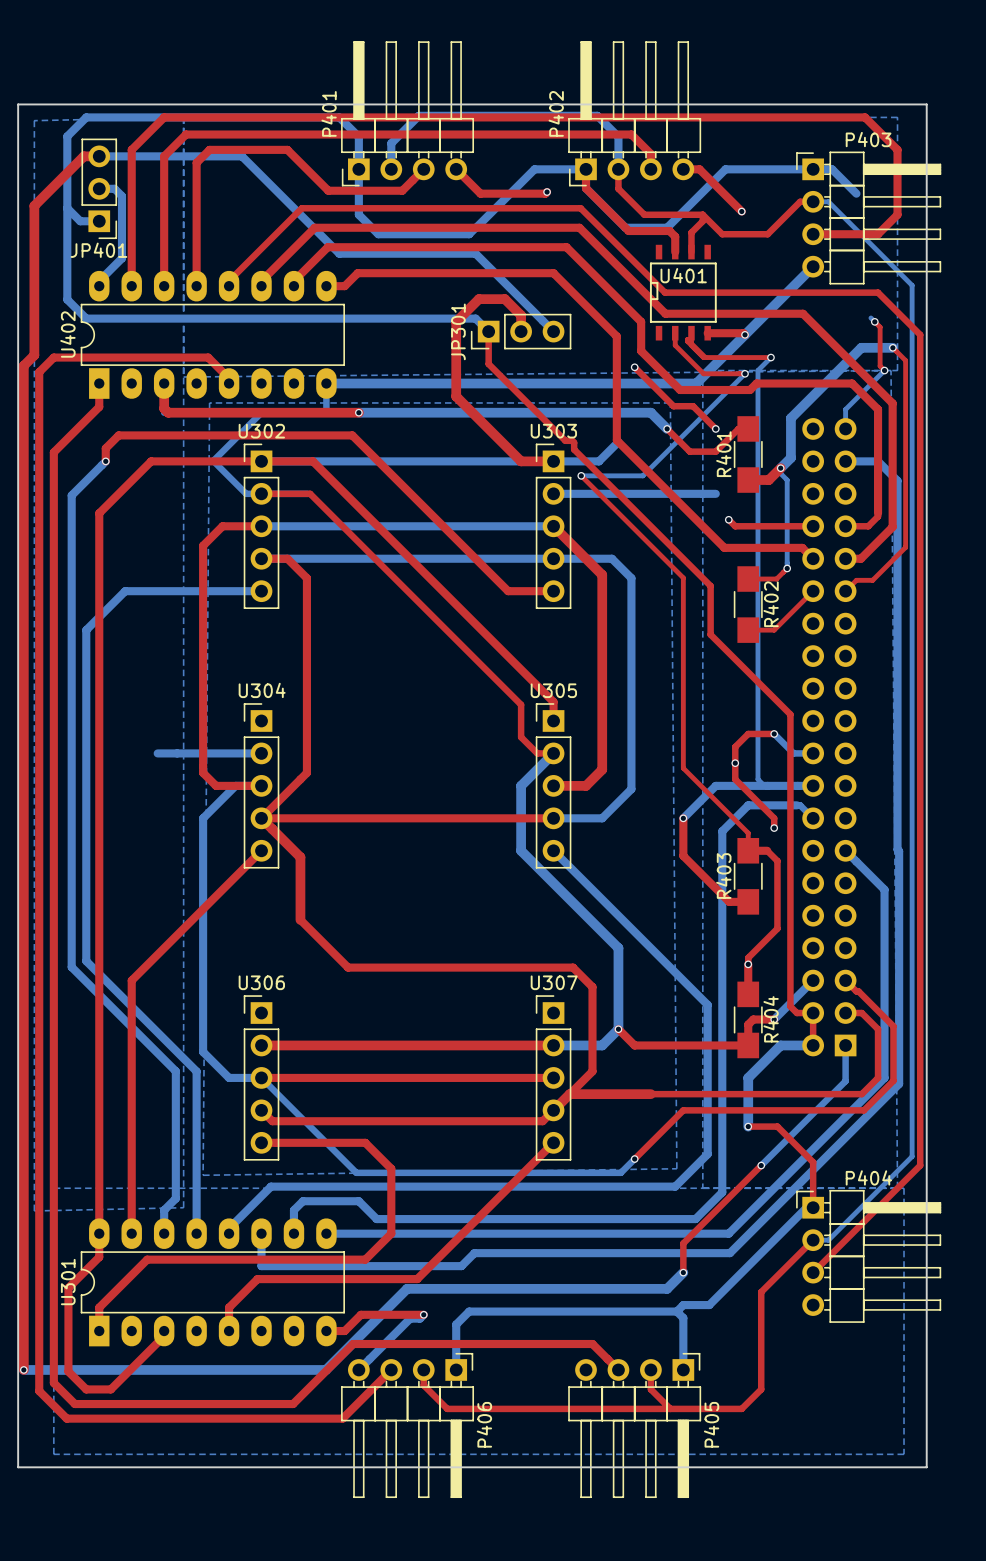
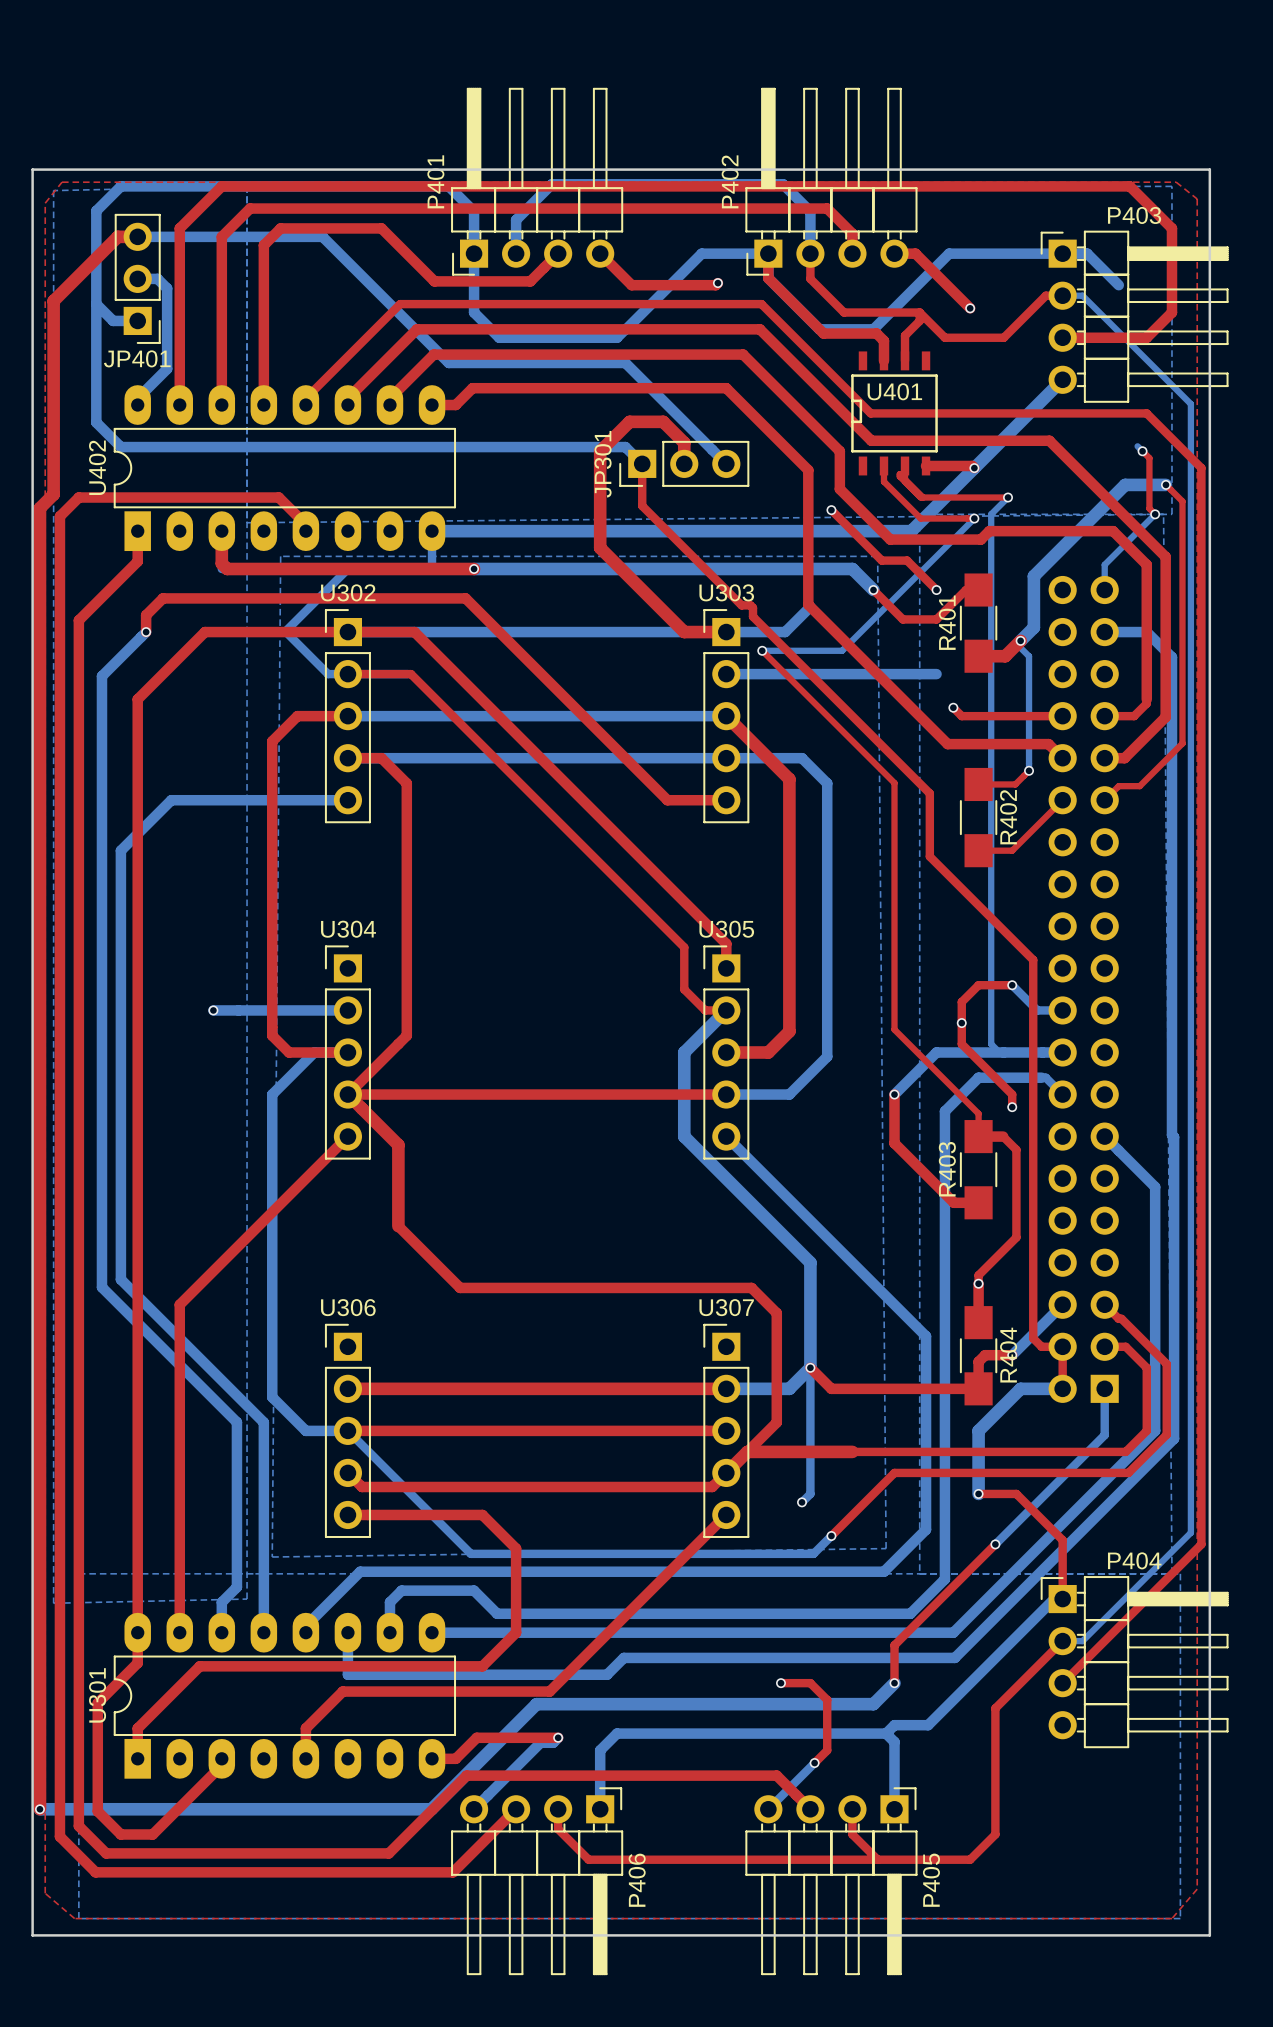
top zone outline: none -> (62, 182) (45, 203) (45, 1893) (74, 1918) (1171, 1918) (1197, 1889) (1197, 199) (1176, 182) (62, 182)
via: none -> (213, 1010)
bottom track: none -> (810, 1367) (810, 1493) (802, 1502)
via: none -> (802, 1502)
top track: none -> (780, 1683) (810, 1683) (827, 1699) (827, 1750) (814, 1763)
via: none -> (780, 1683)
bottom track: none -> (814, 1763) (768, 1809)
via: none -> (814, 1763)

